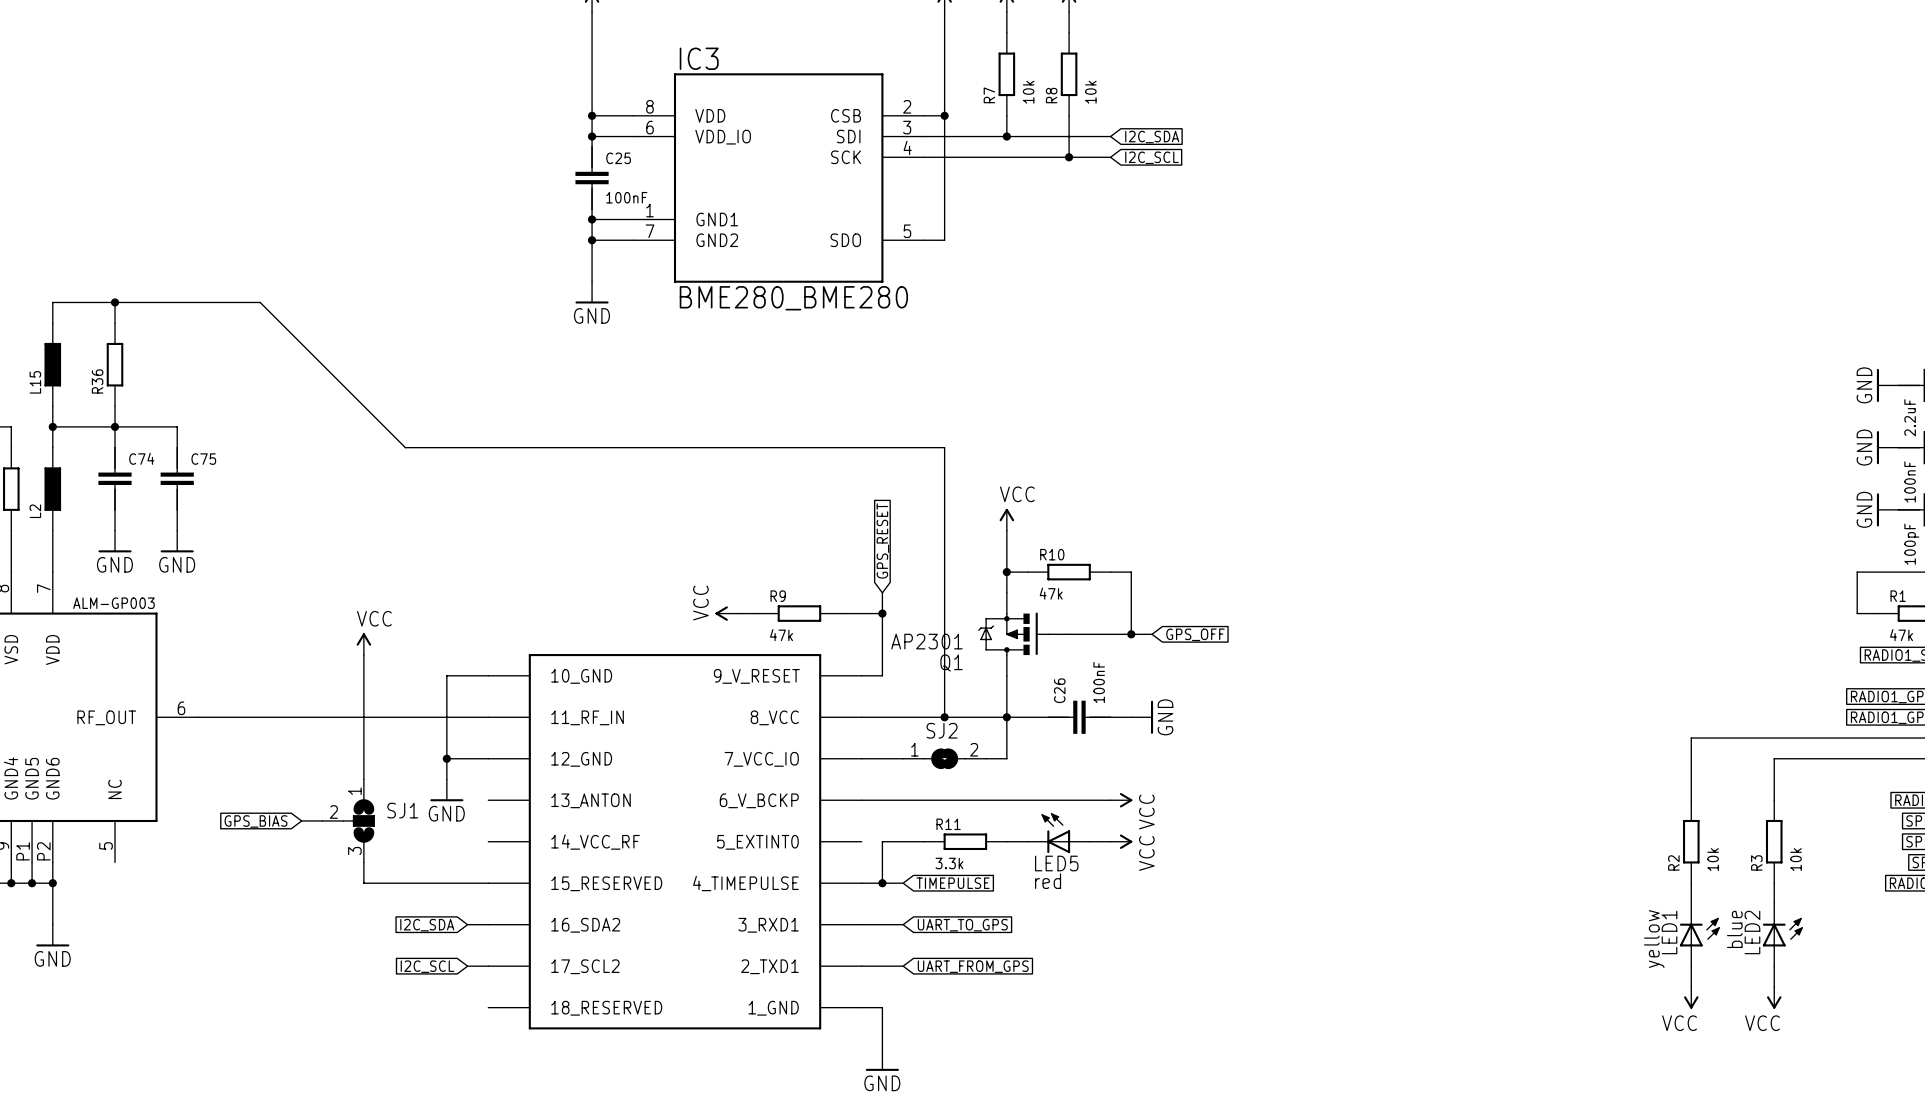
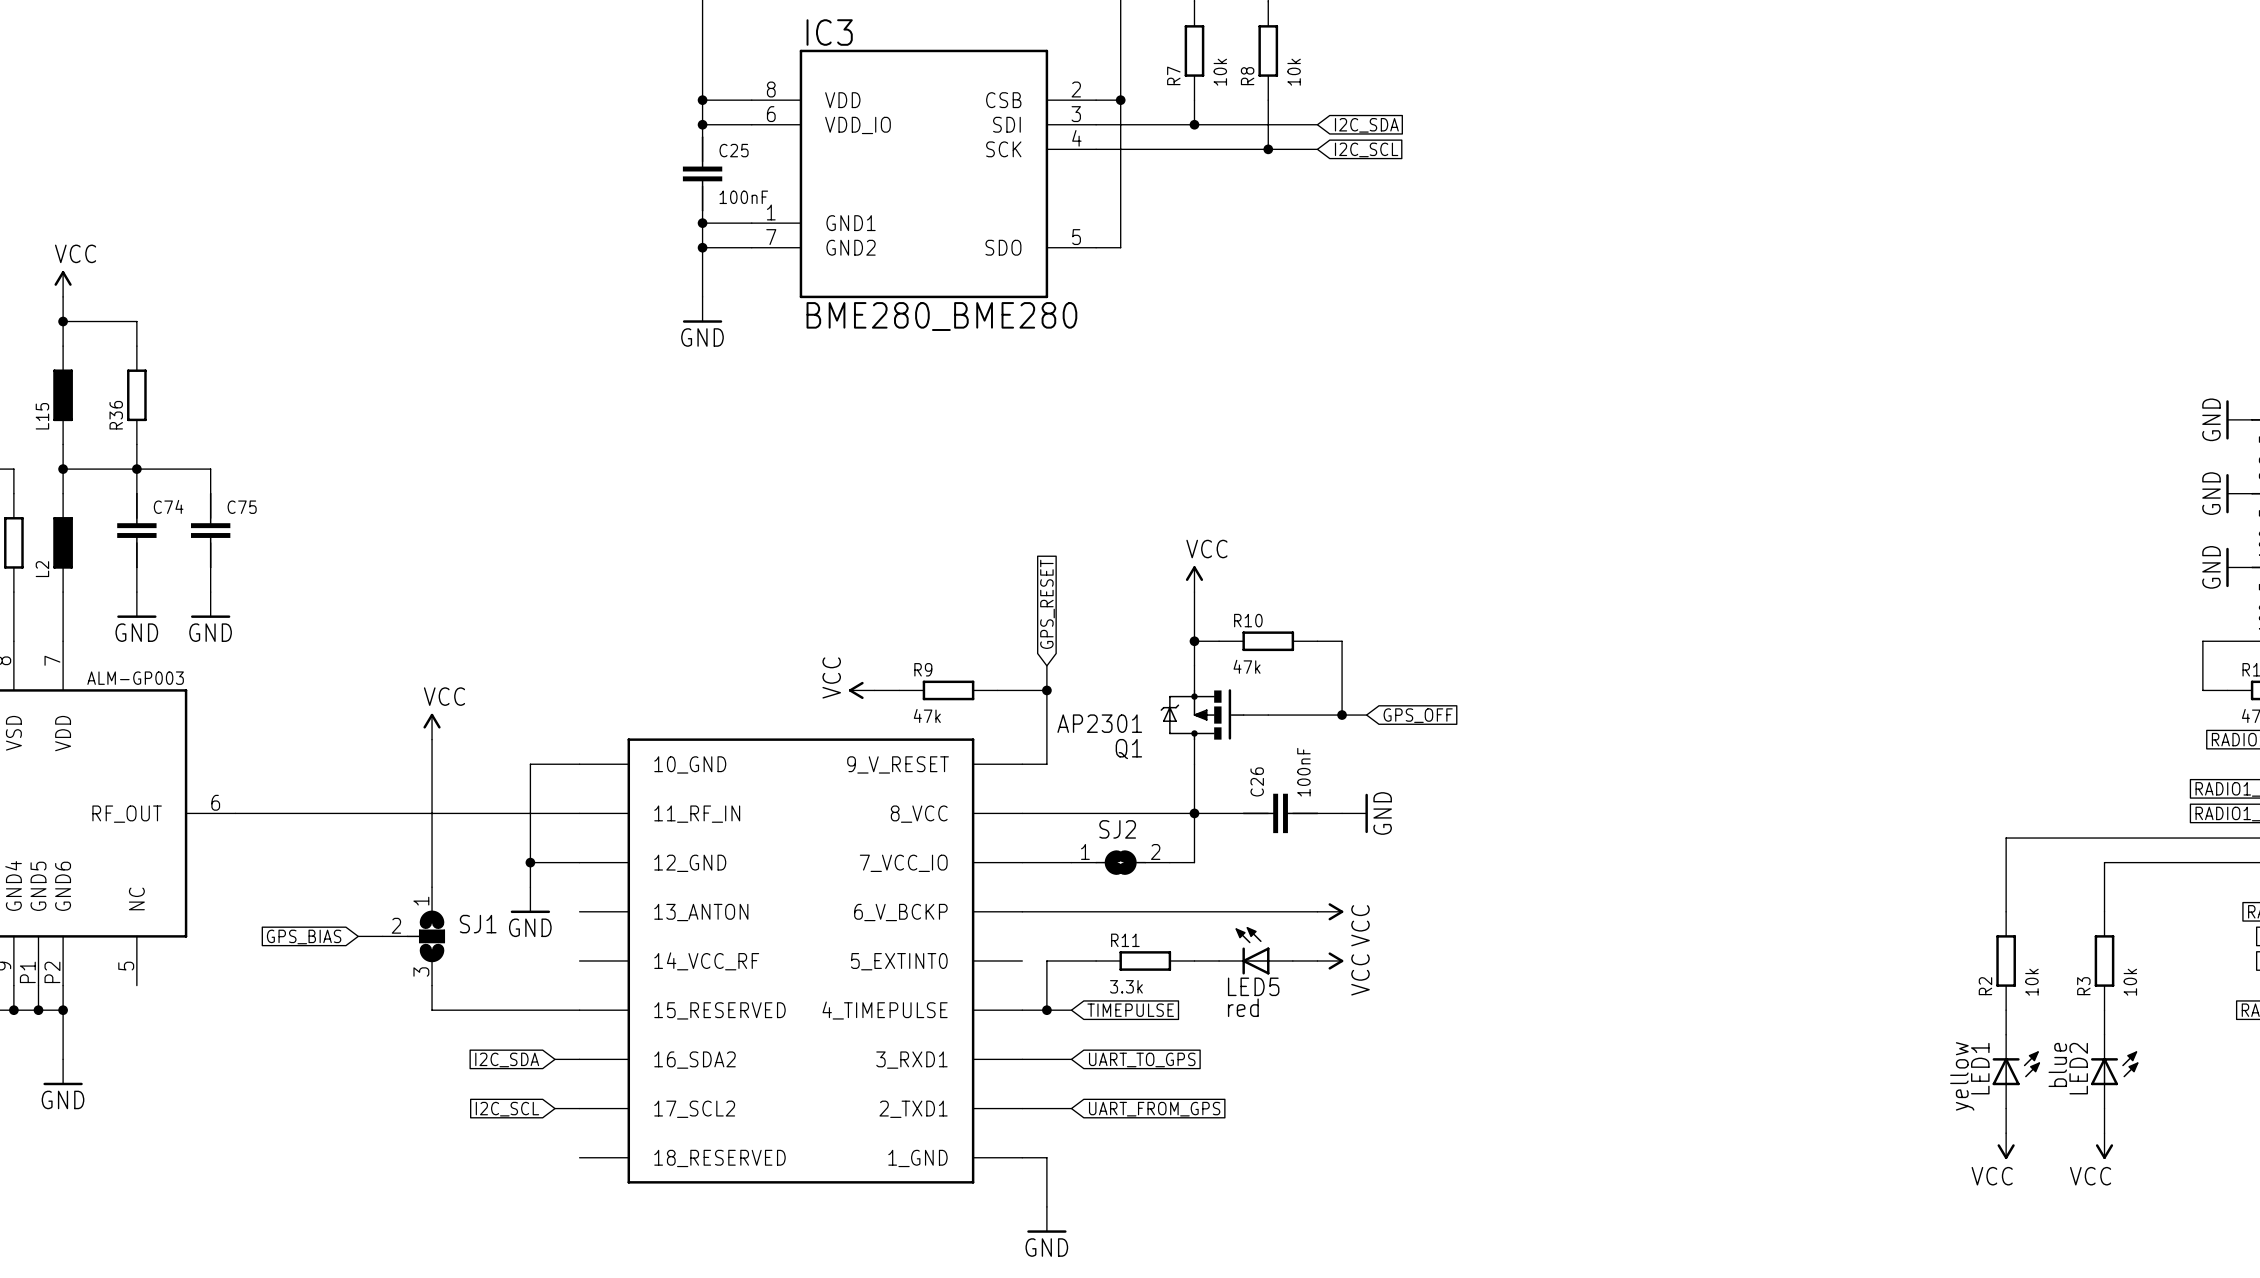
power symbol: none -> VCC (63, 284)
wire: none -> (63, 296) (63, 321)
junction: none -> (63, 321)
wire: (115, 302) (260, 302) (405, 447) (944, 447) (944, 717) -> none
junction: (115, 302) -> none
junction: (944, 717) -> none

